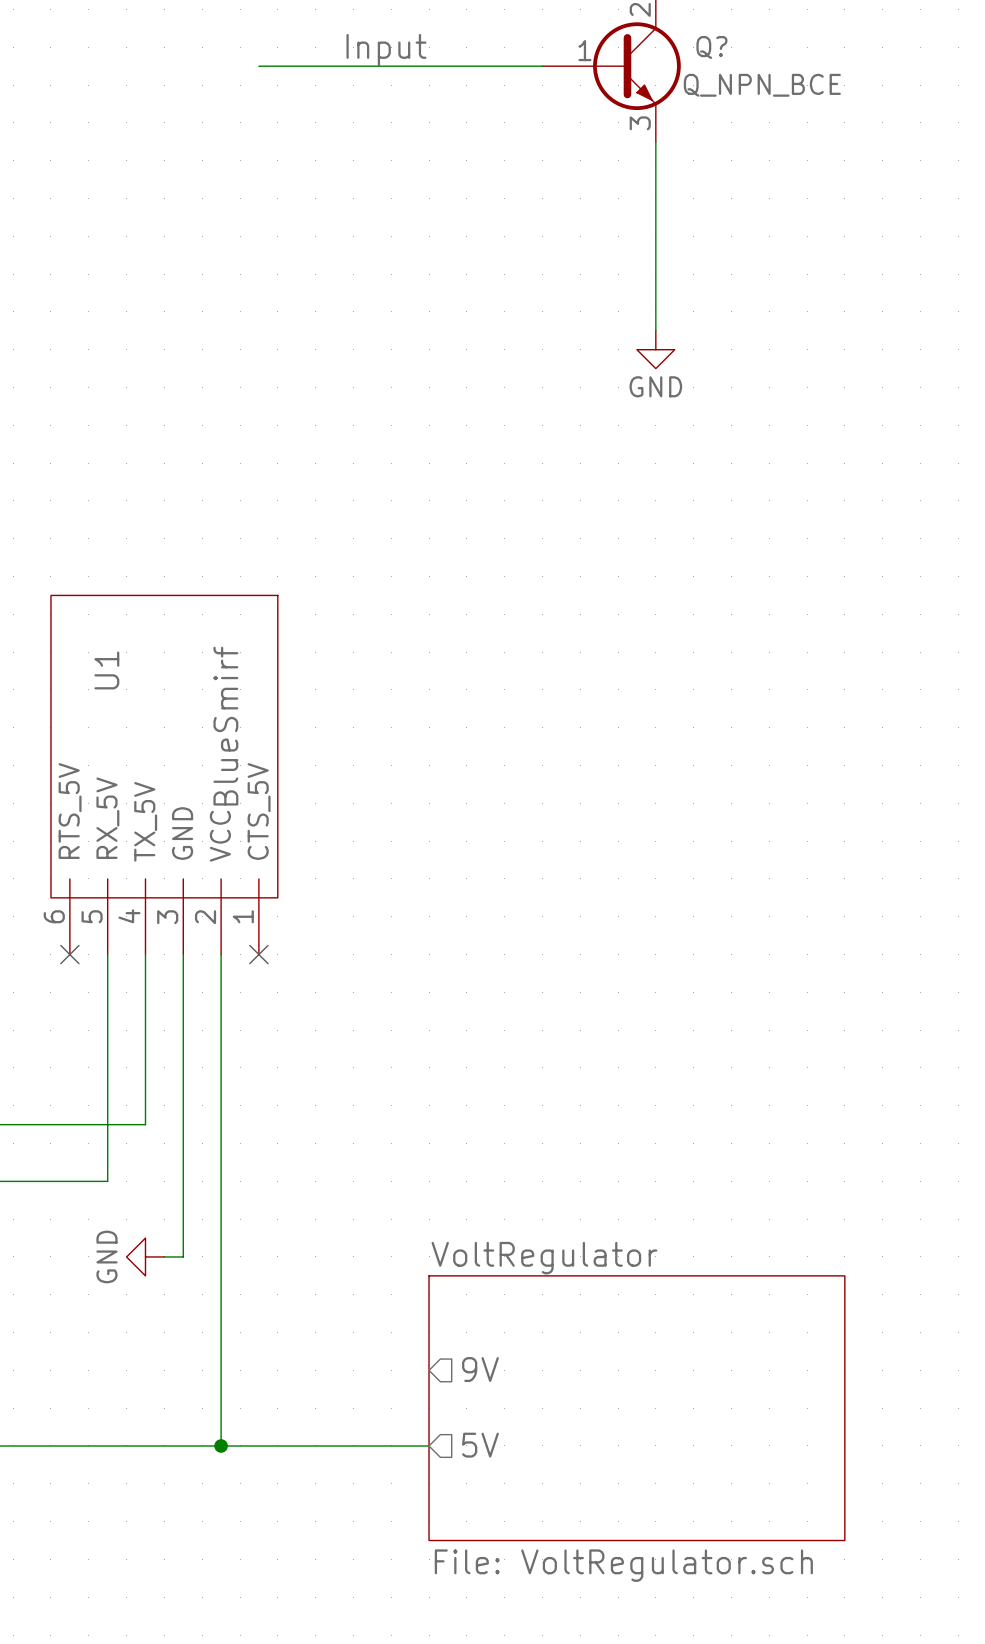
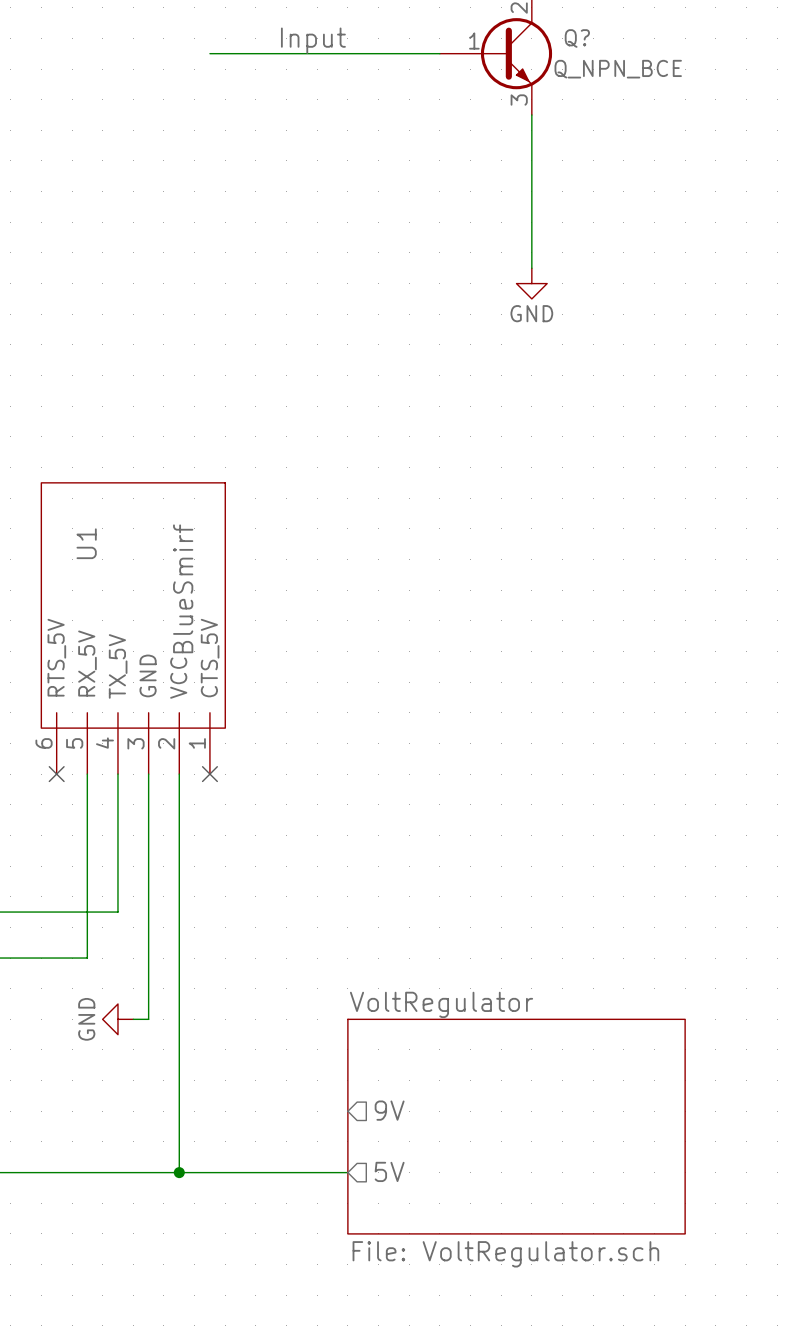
sheet VoltRegulator position: (636, 1408) -> (516, 1126)

